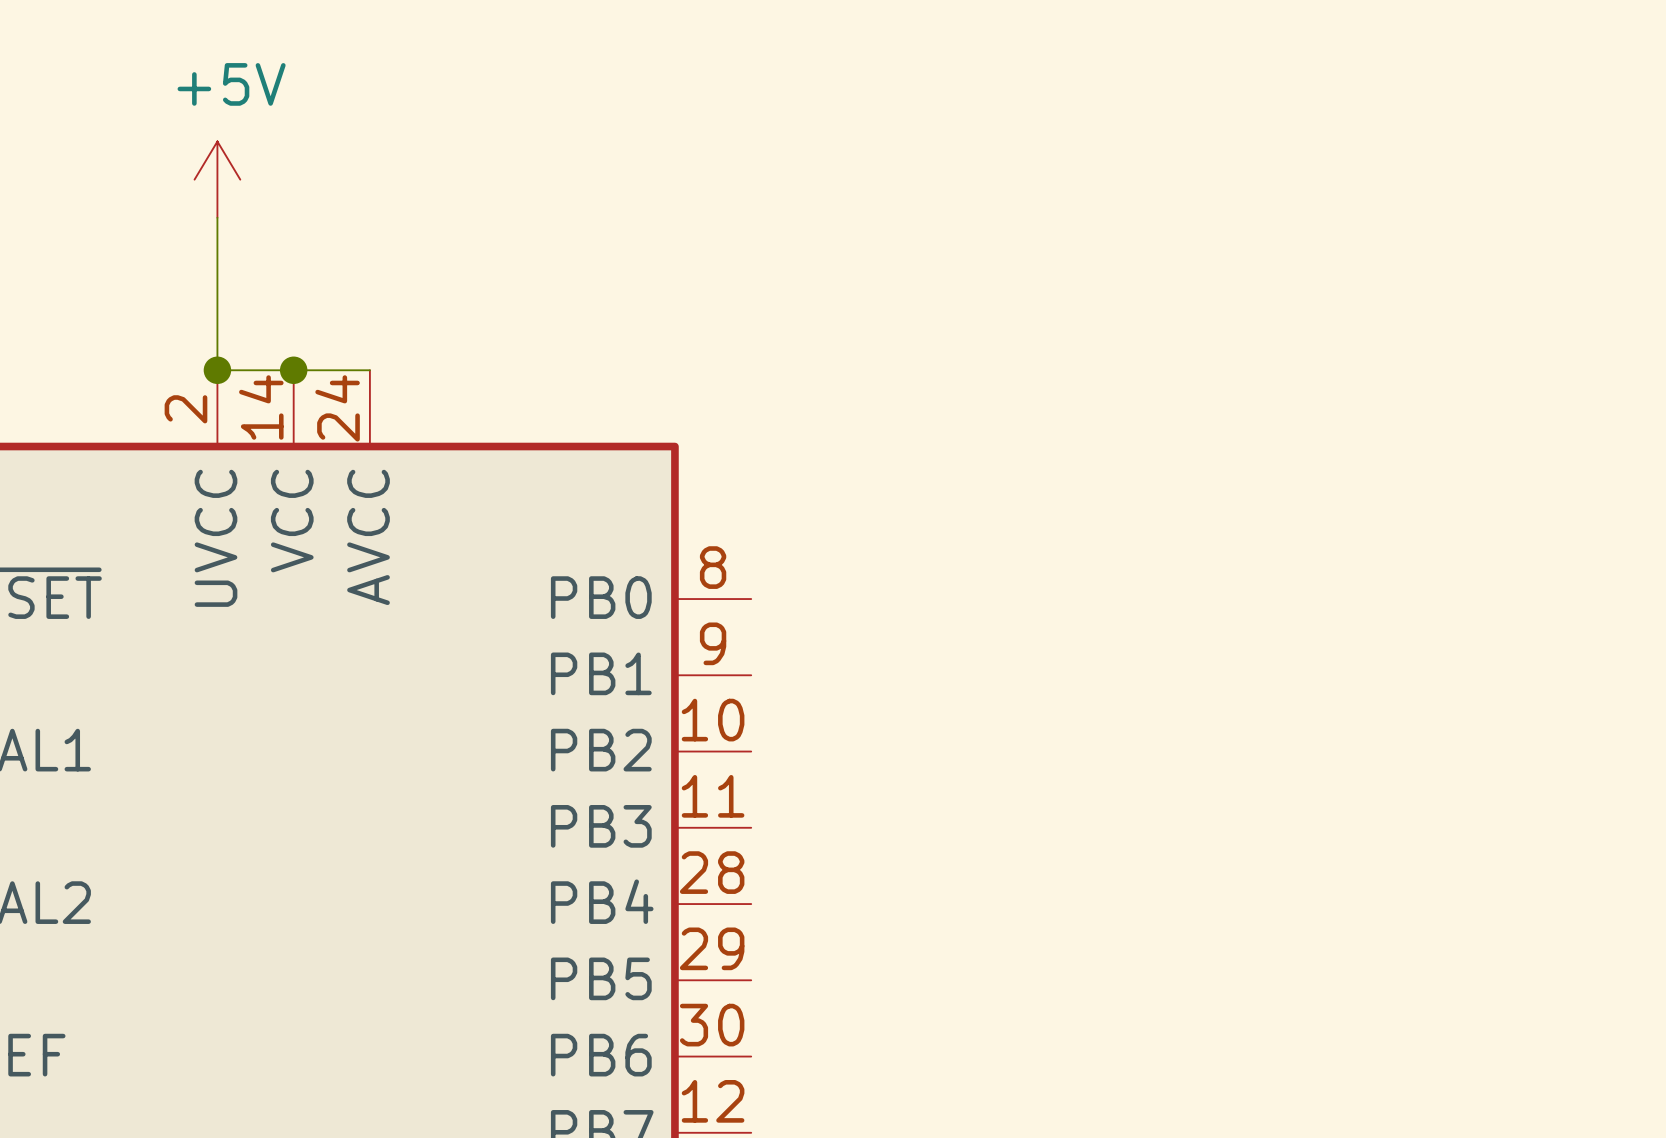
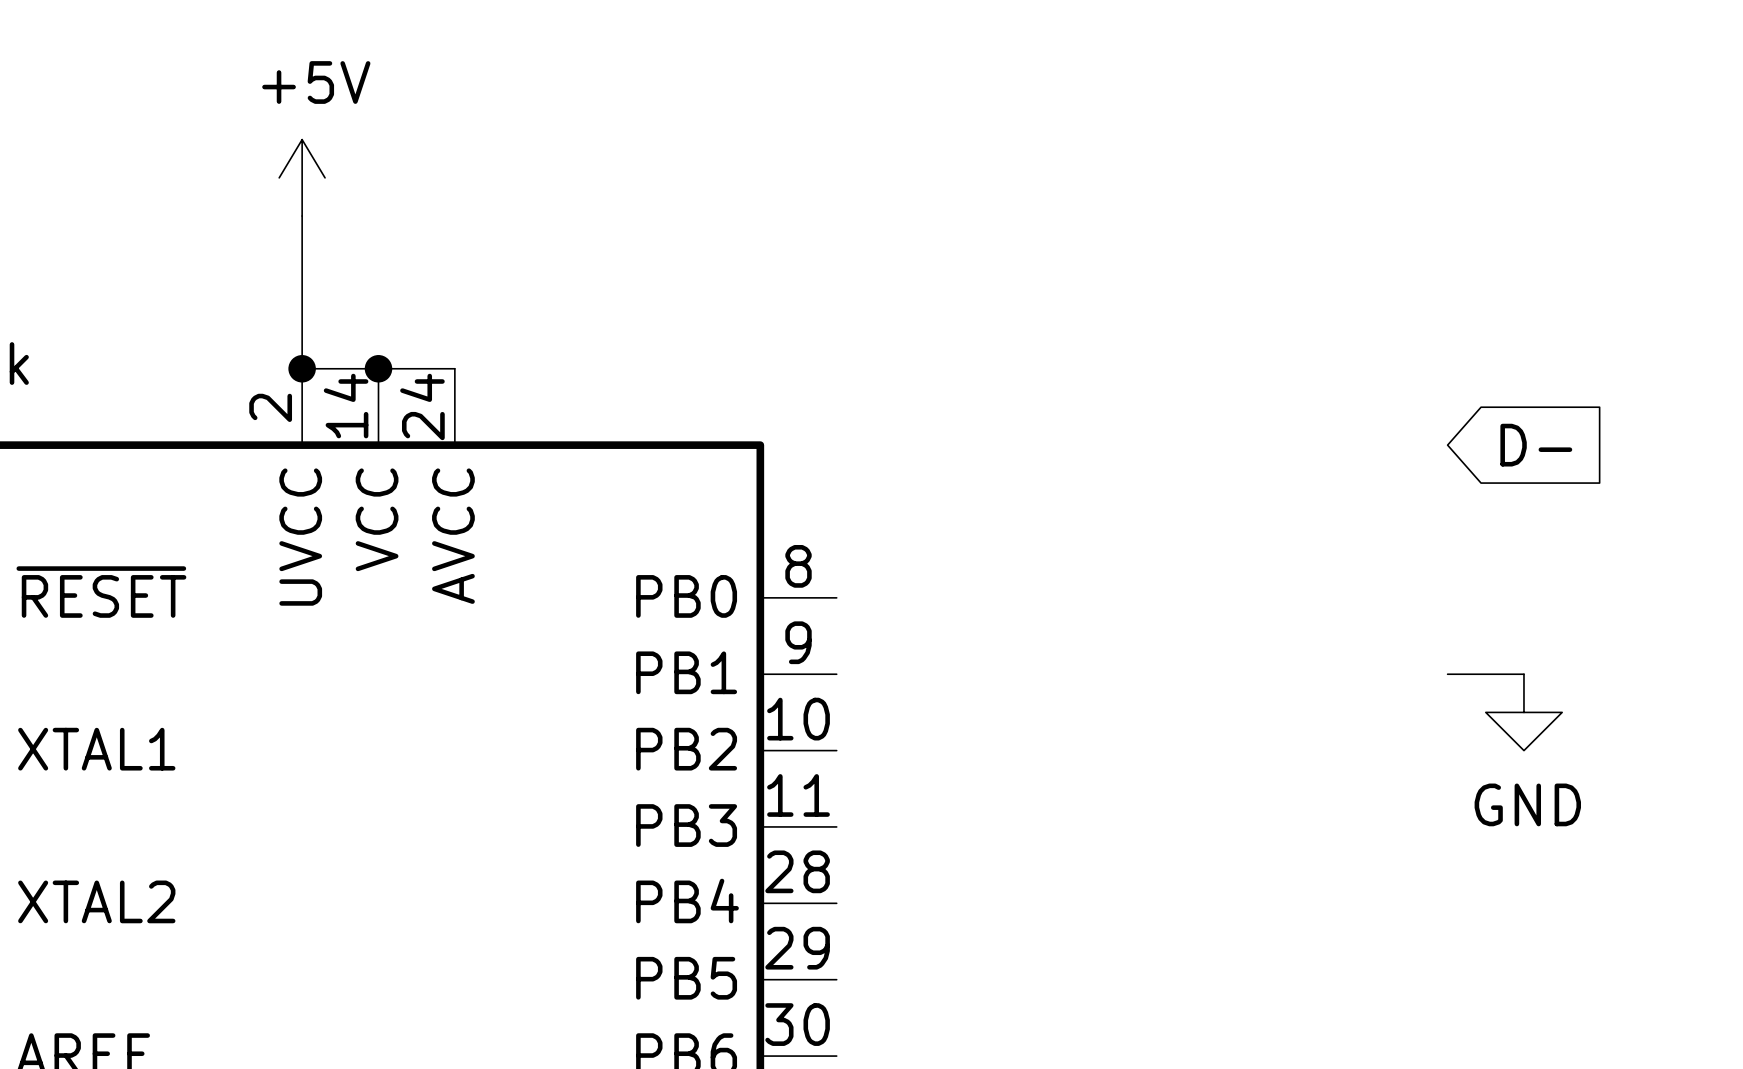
global label: none -> D- (1536, 445)
wire: none -> (1447, 674) (1523, 674)
power symbol: none -> GND (1523, 712)

